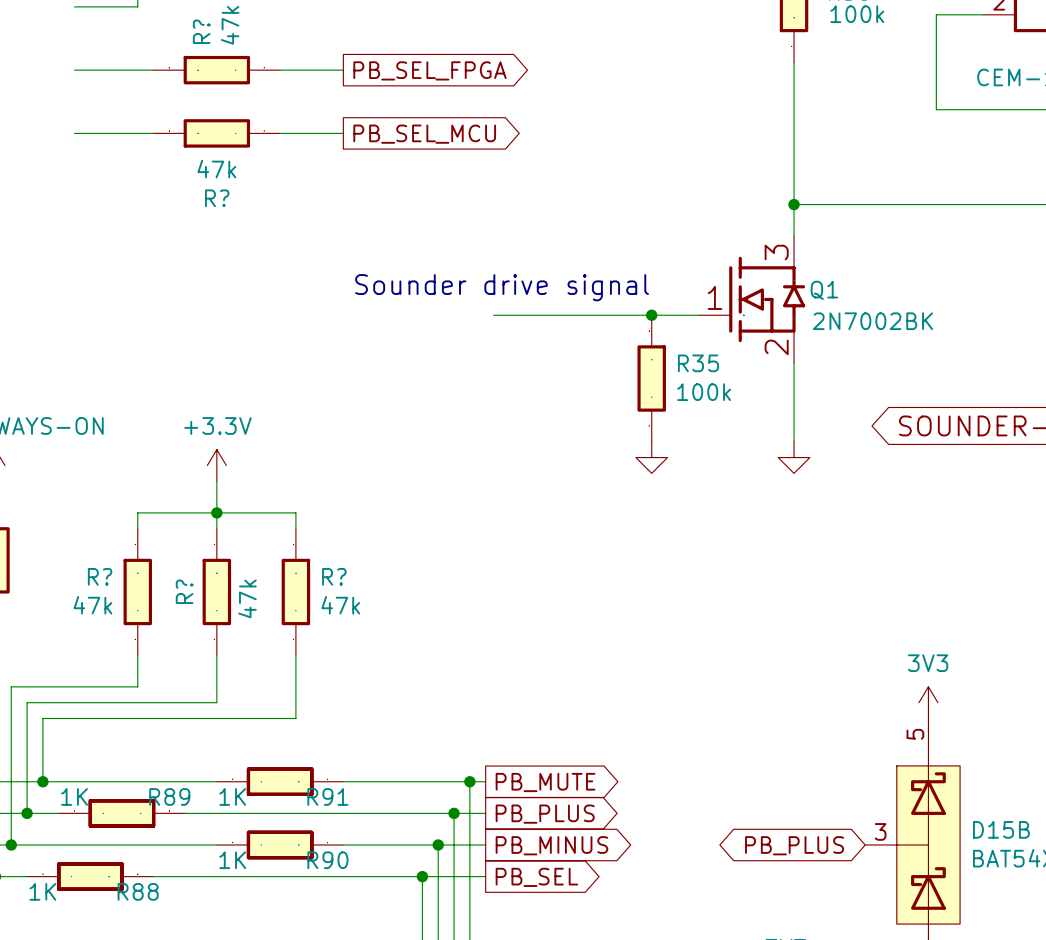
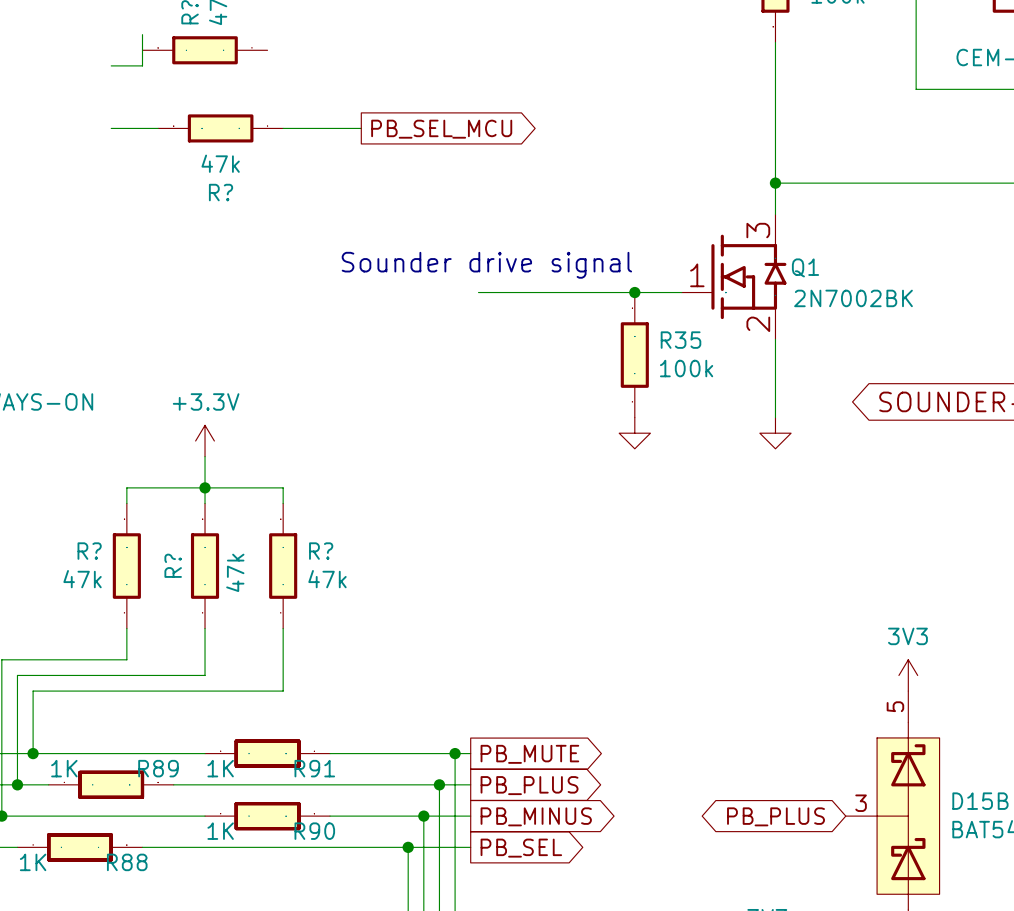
wire: none -> (142, 34) (142, 65) (111, 65)
wire: (74, 70) (153, 70) -> none
wire: (280, 70) (343, 70) -> none
global label: PB_SEL_FPGA (429, 70) -> none
wire: (74, 133) (153, 133) -> (283, 128) (361, 128)
R? position: (216, 133) -> (220, 128)
wire: (280, 133) (343, 133) -> none
global label position: PB_SEL_MCU (424, 134) -> PB_SEL_MCU (441, 129)
wire: none -> (111, 128) (158, 128)

